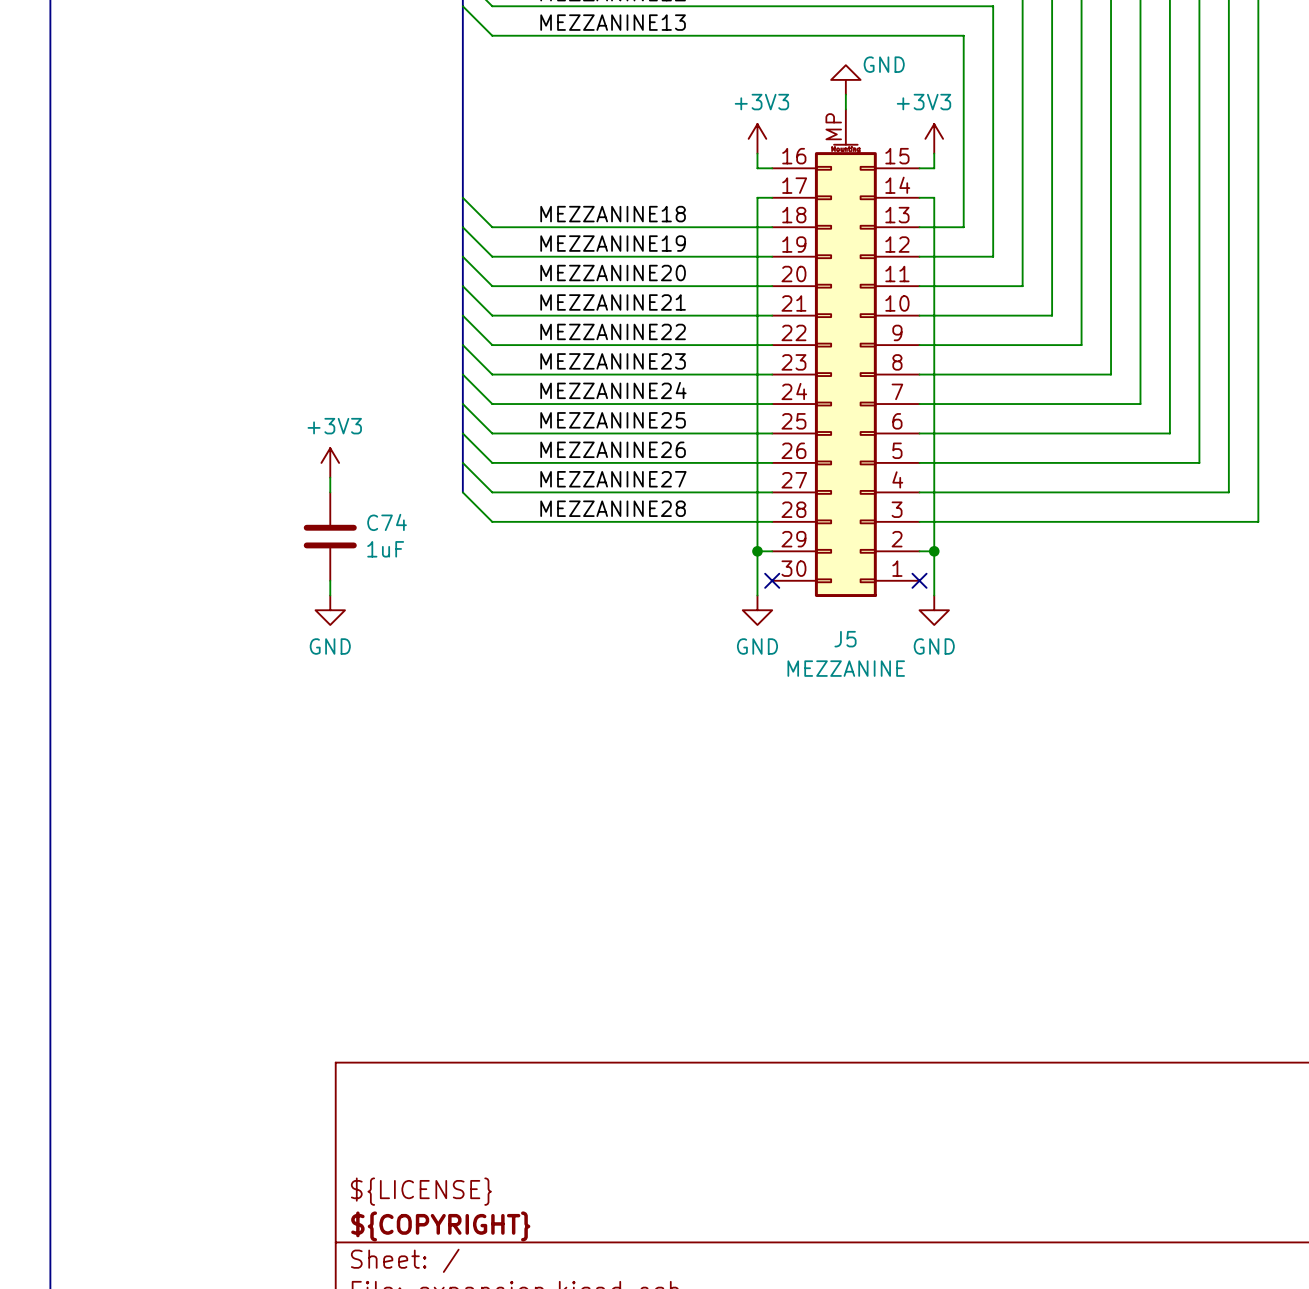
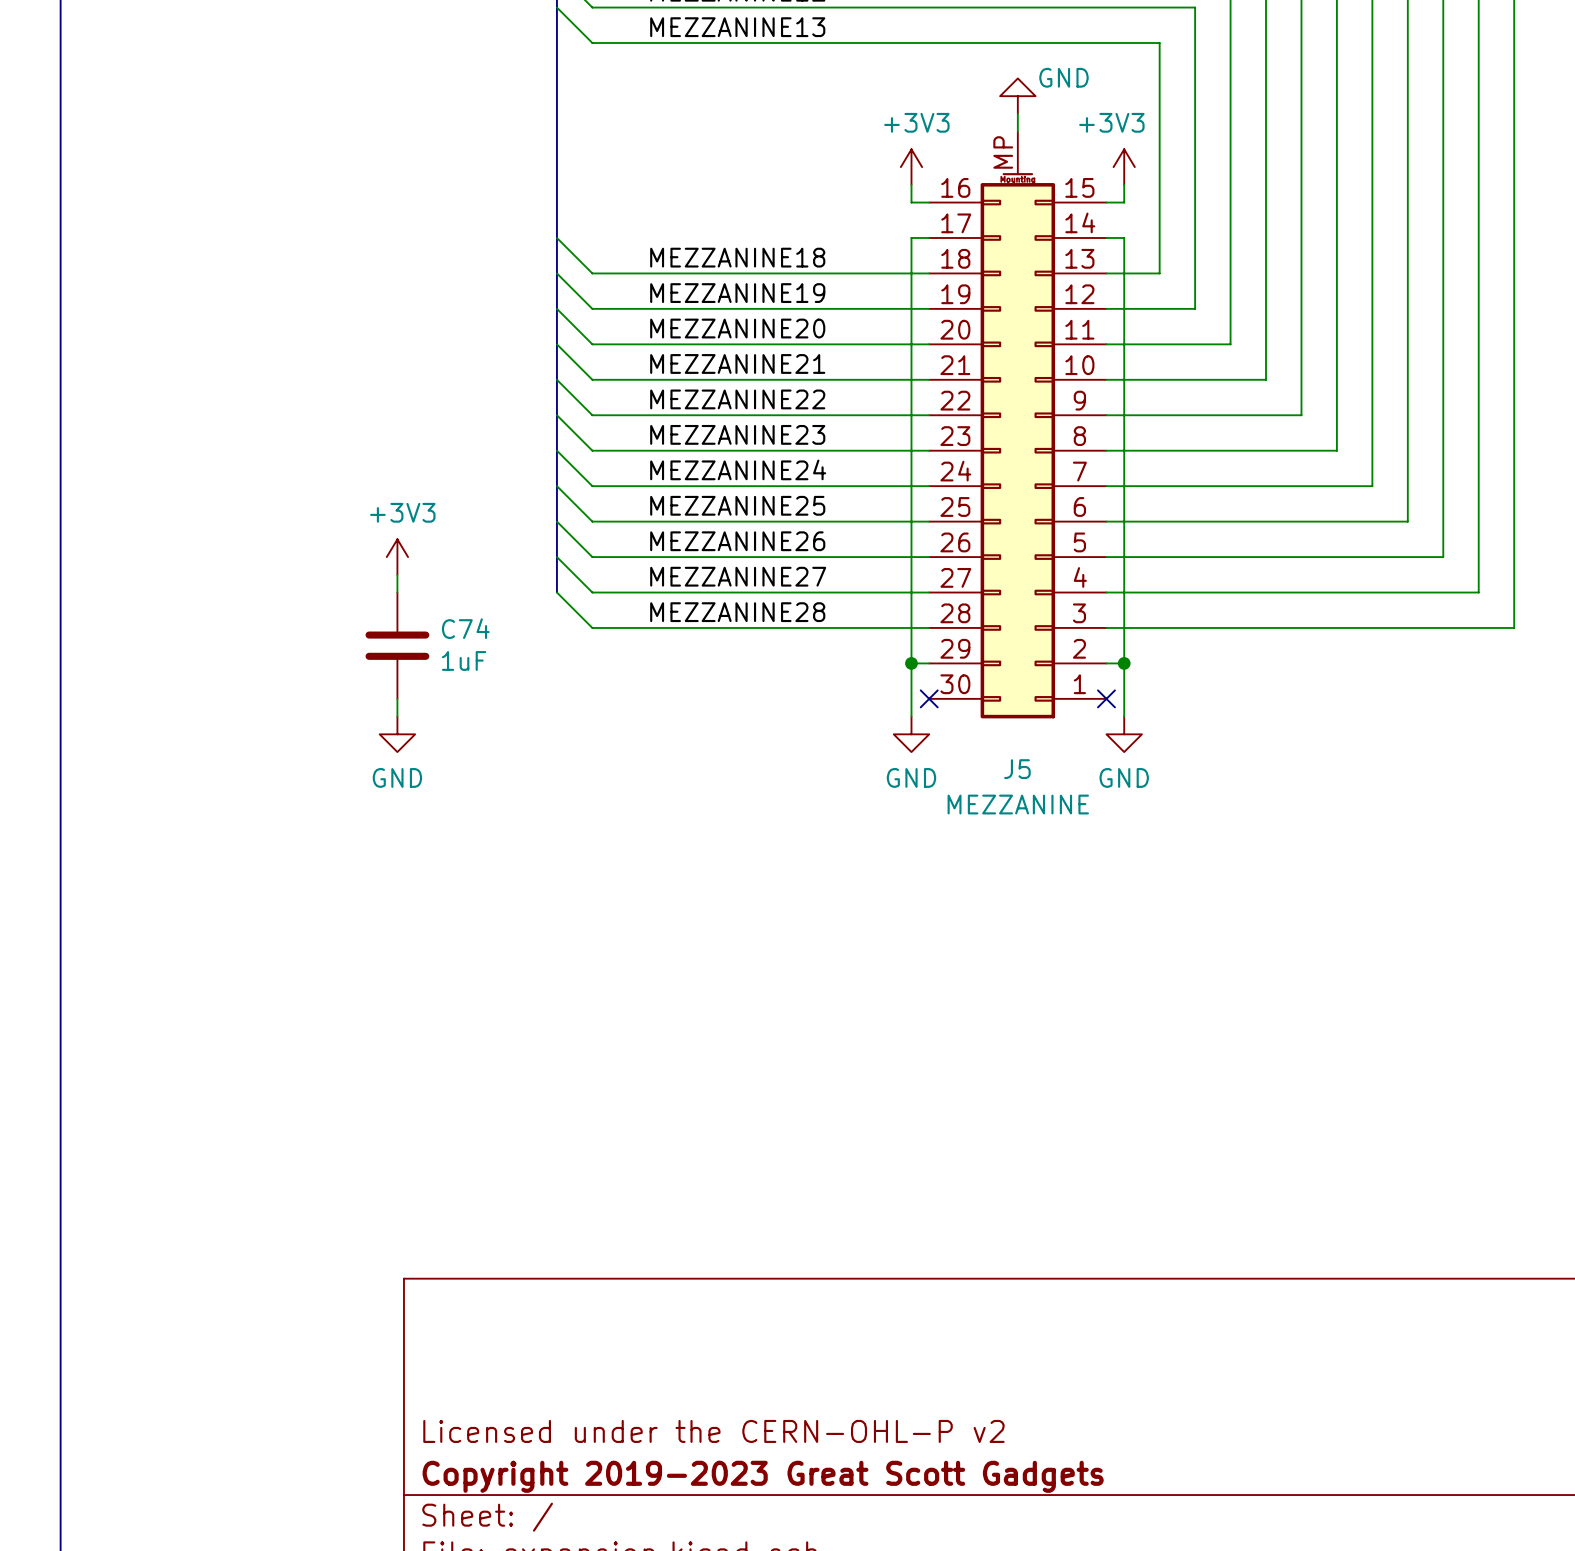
title block: ${LICENSE} (421, 1191) -> Licensed under the CERN-OHL-P v2 (713, 1431)
title block: ${COPYRIGHT} (440, 1226) -> Copyright 2019-2023 Great Scott Gadgets (763, 1476)

